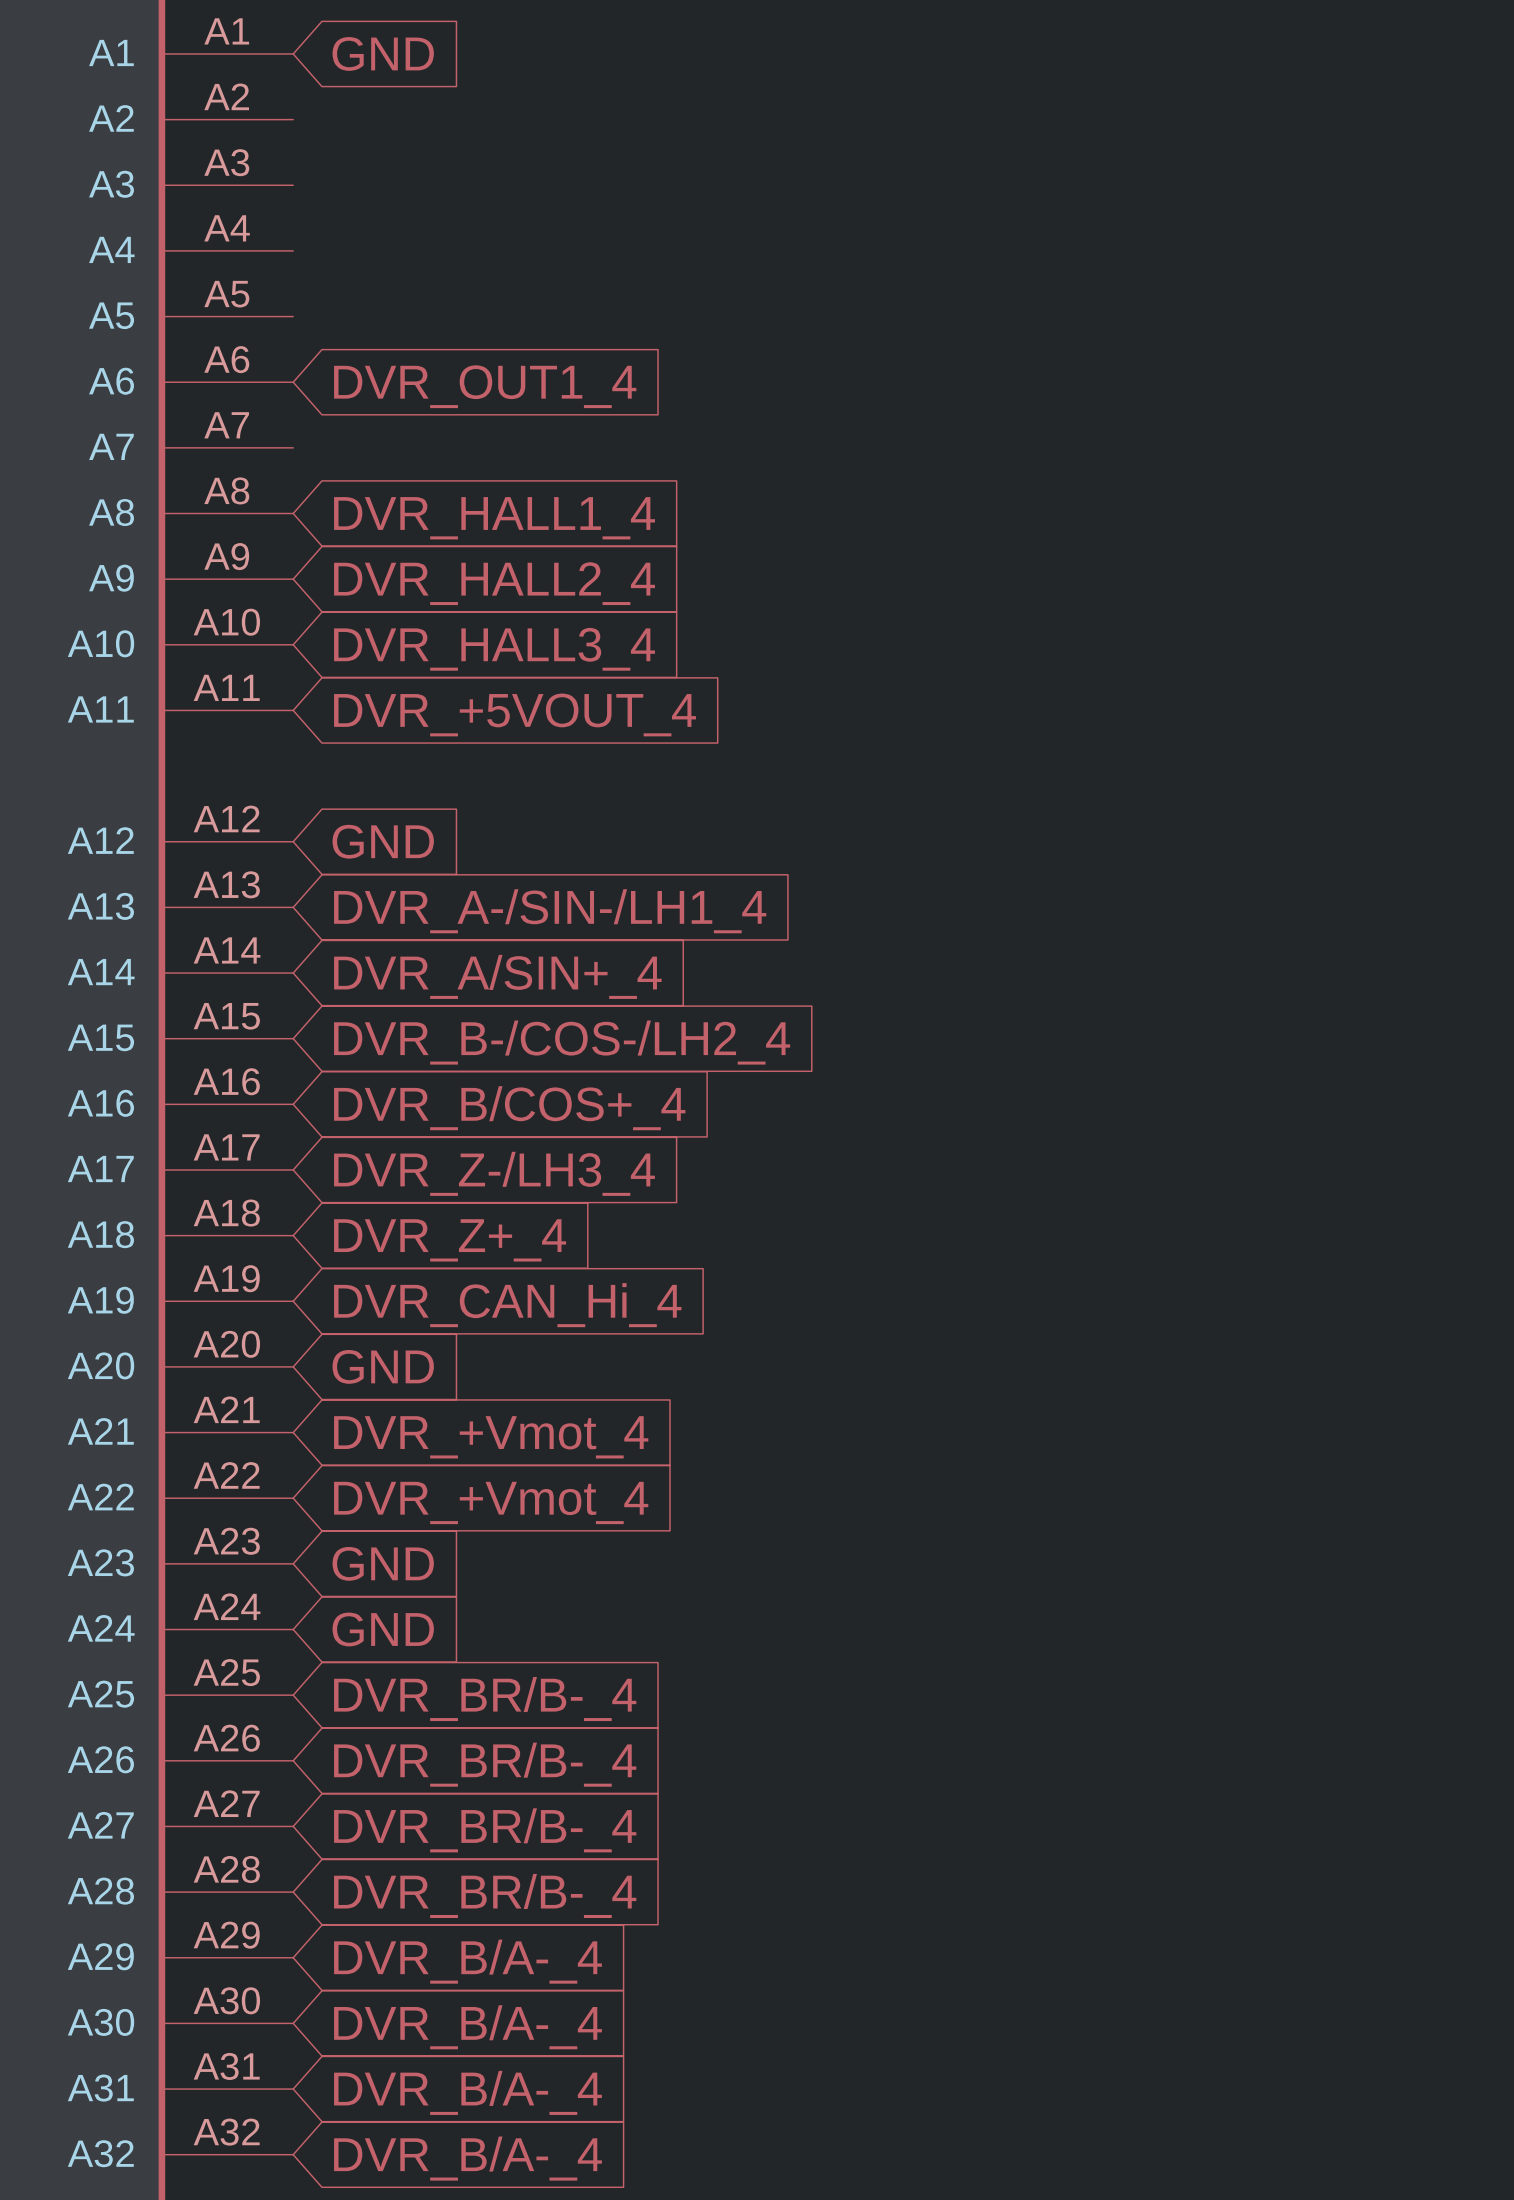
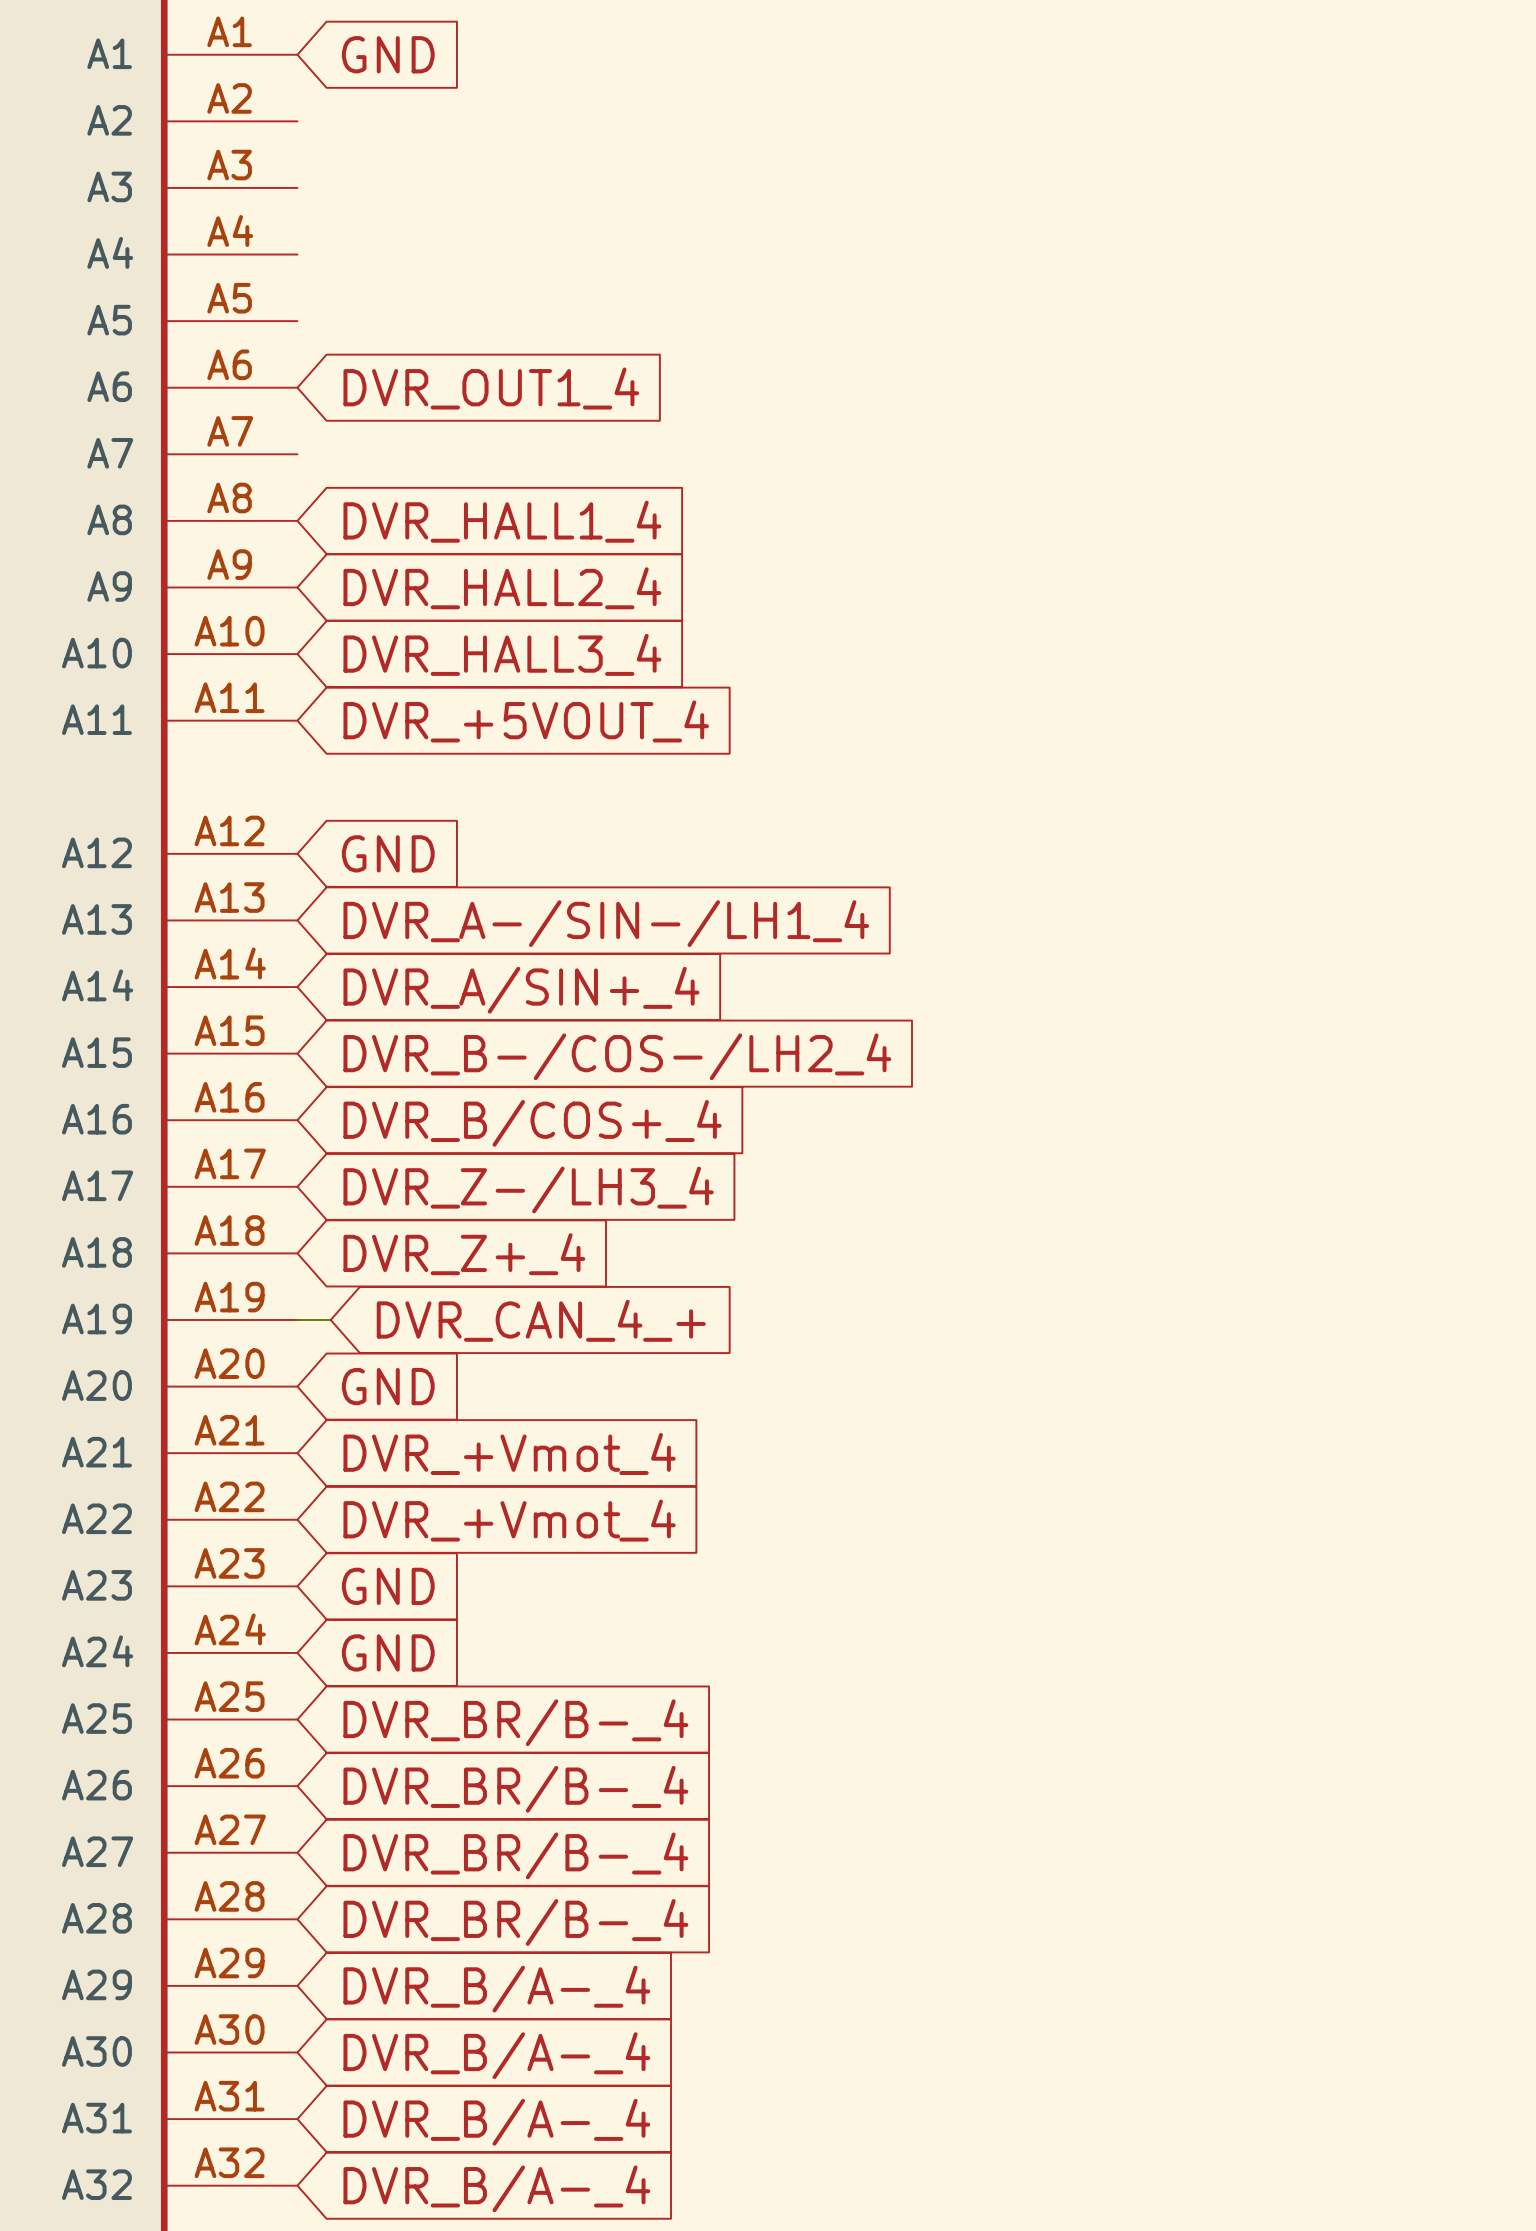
wire: none -> (297, 1319) (330, 1319)
global label: DVR_CAN_Hi_4 (507, 1305) -> DVR_CAN_4_+ (541, 1320)

